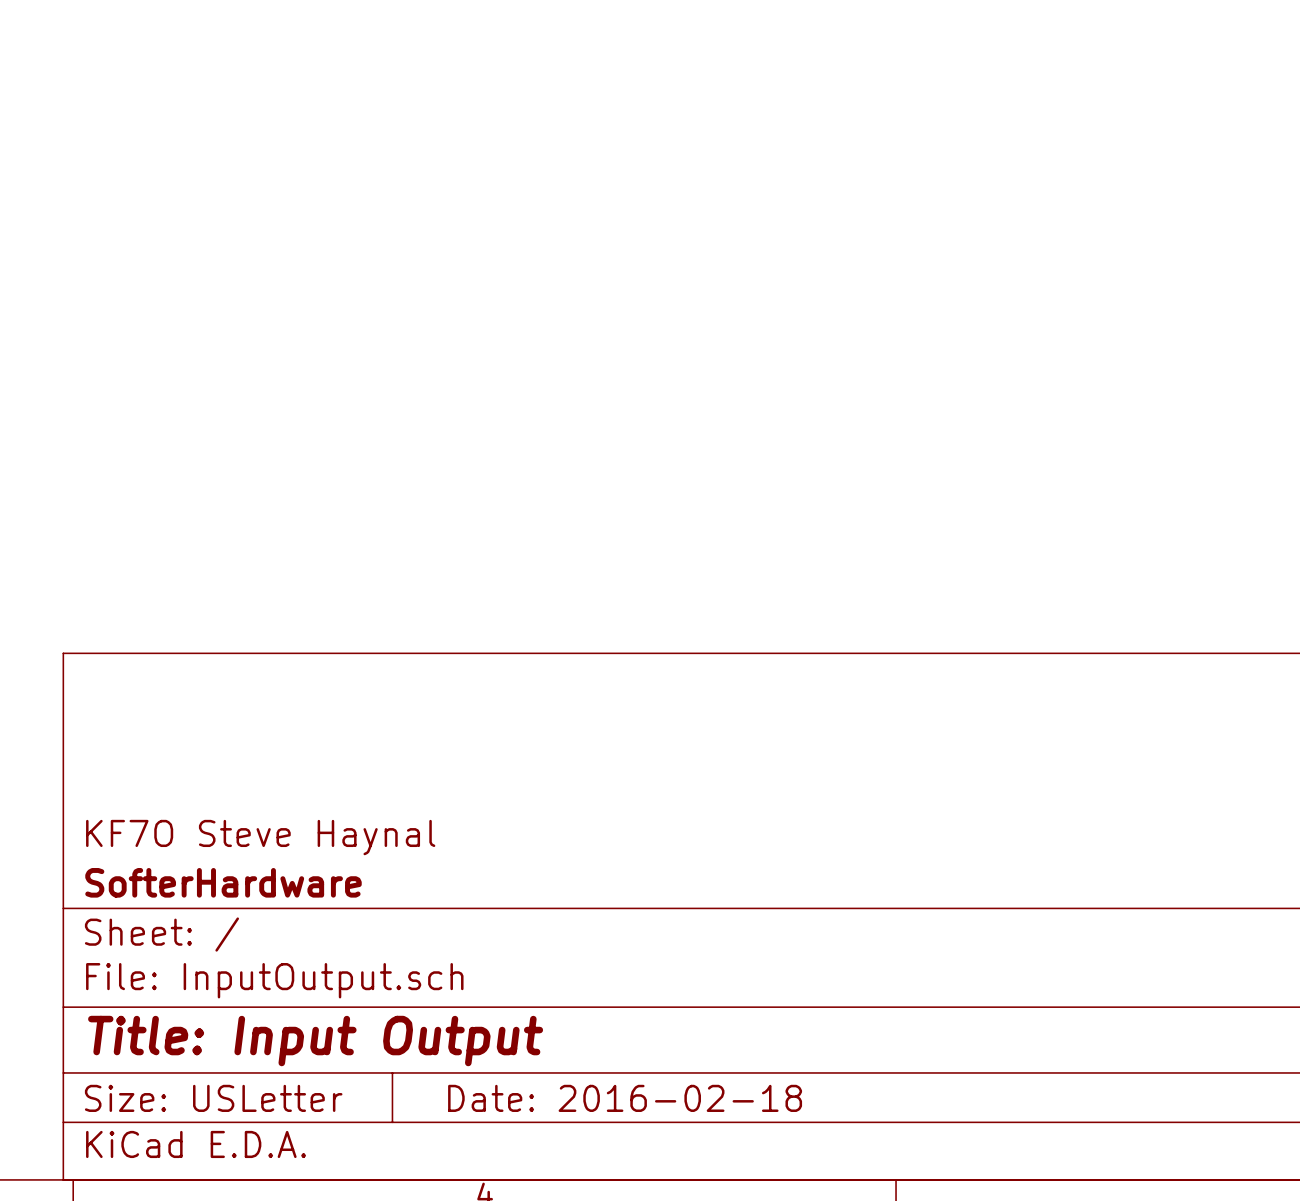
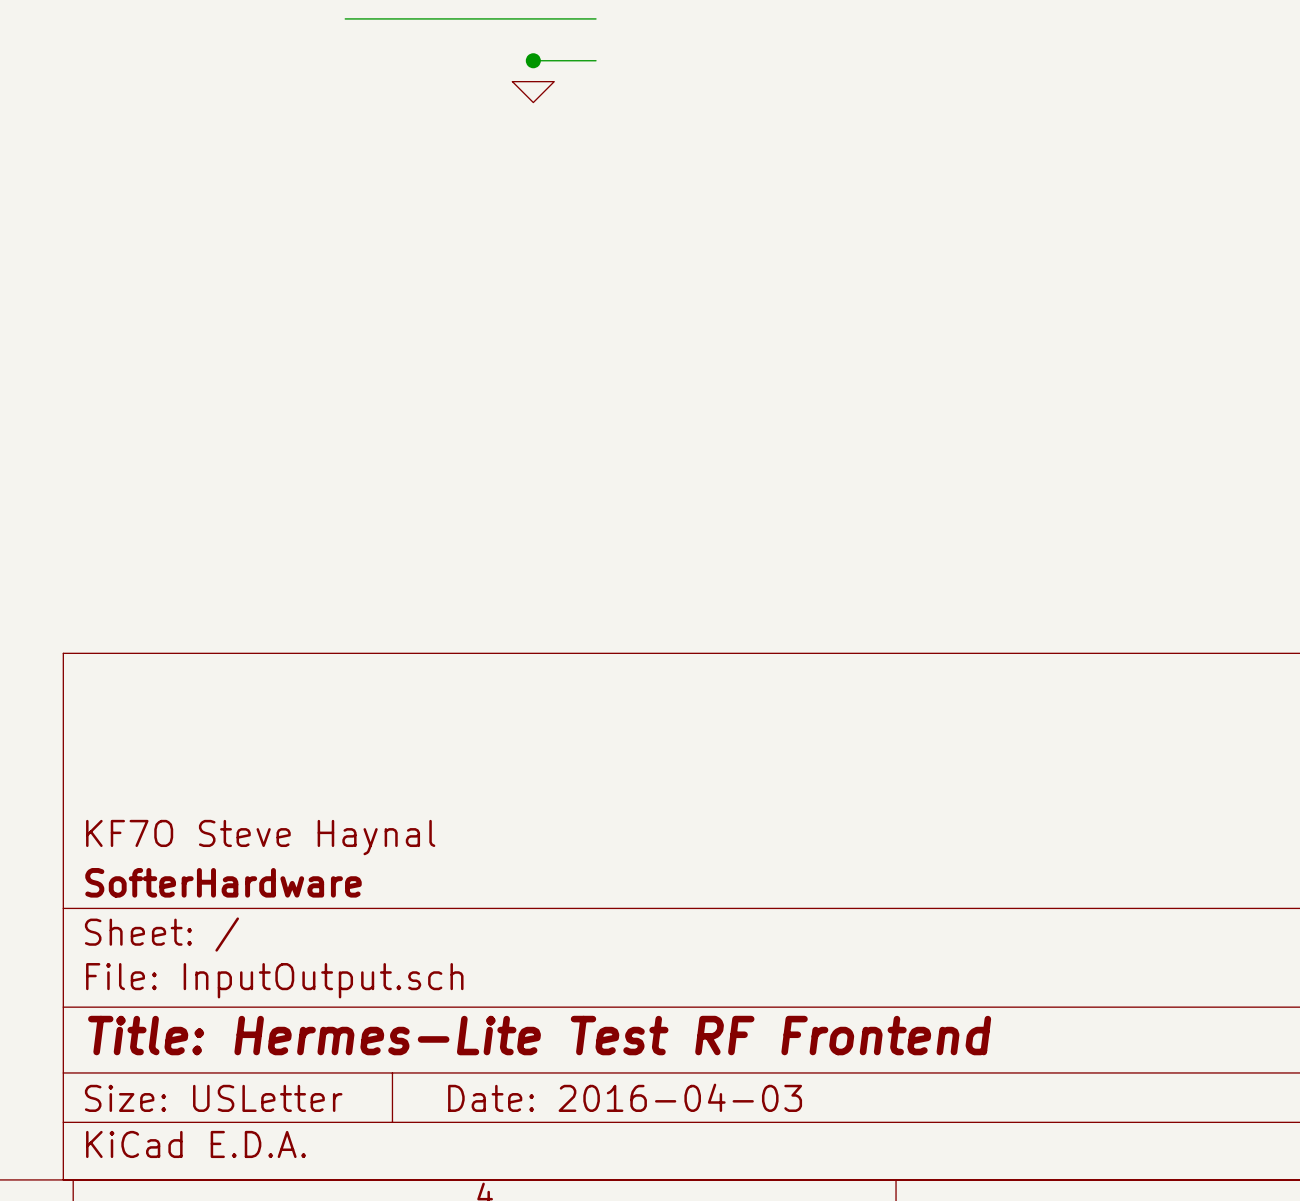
wire: none -> (345, 18) (596, 18)
wire: none -> (533, 60) (596, 60)
junction: none -> (533, 60)
power symbol: none -> (533, 92)
title block: Title: Input Output (315, 1041) -> Title: Hermes-Lite Test RF Frontend (539, 1035)
title block: Date: 2016-02-18 (625, 1098) -> Date: 2016-04-03 (625, 1097)

